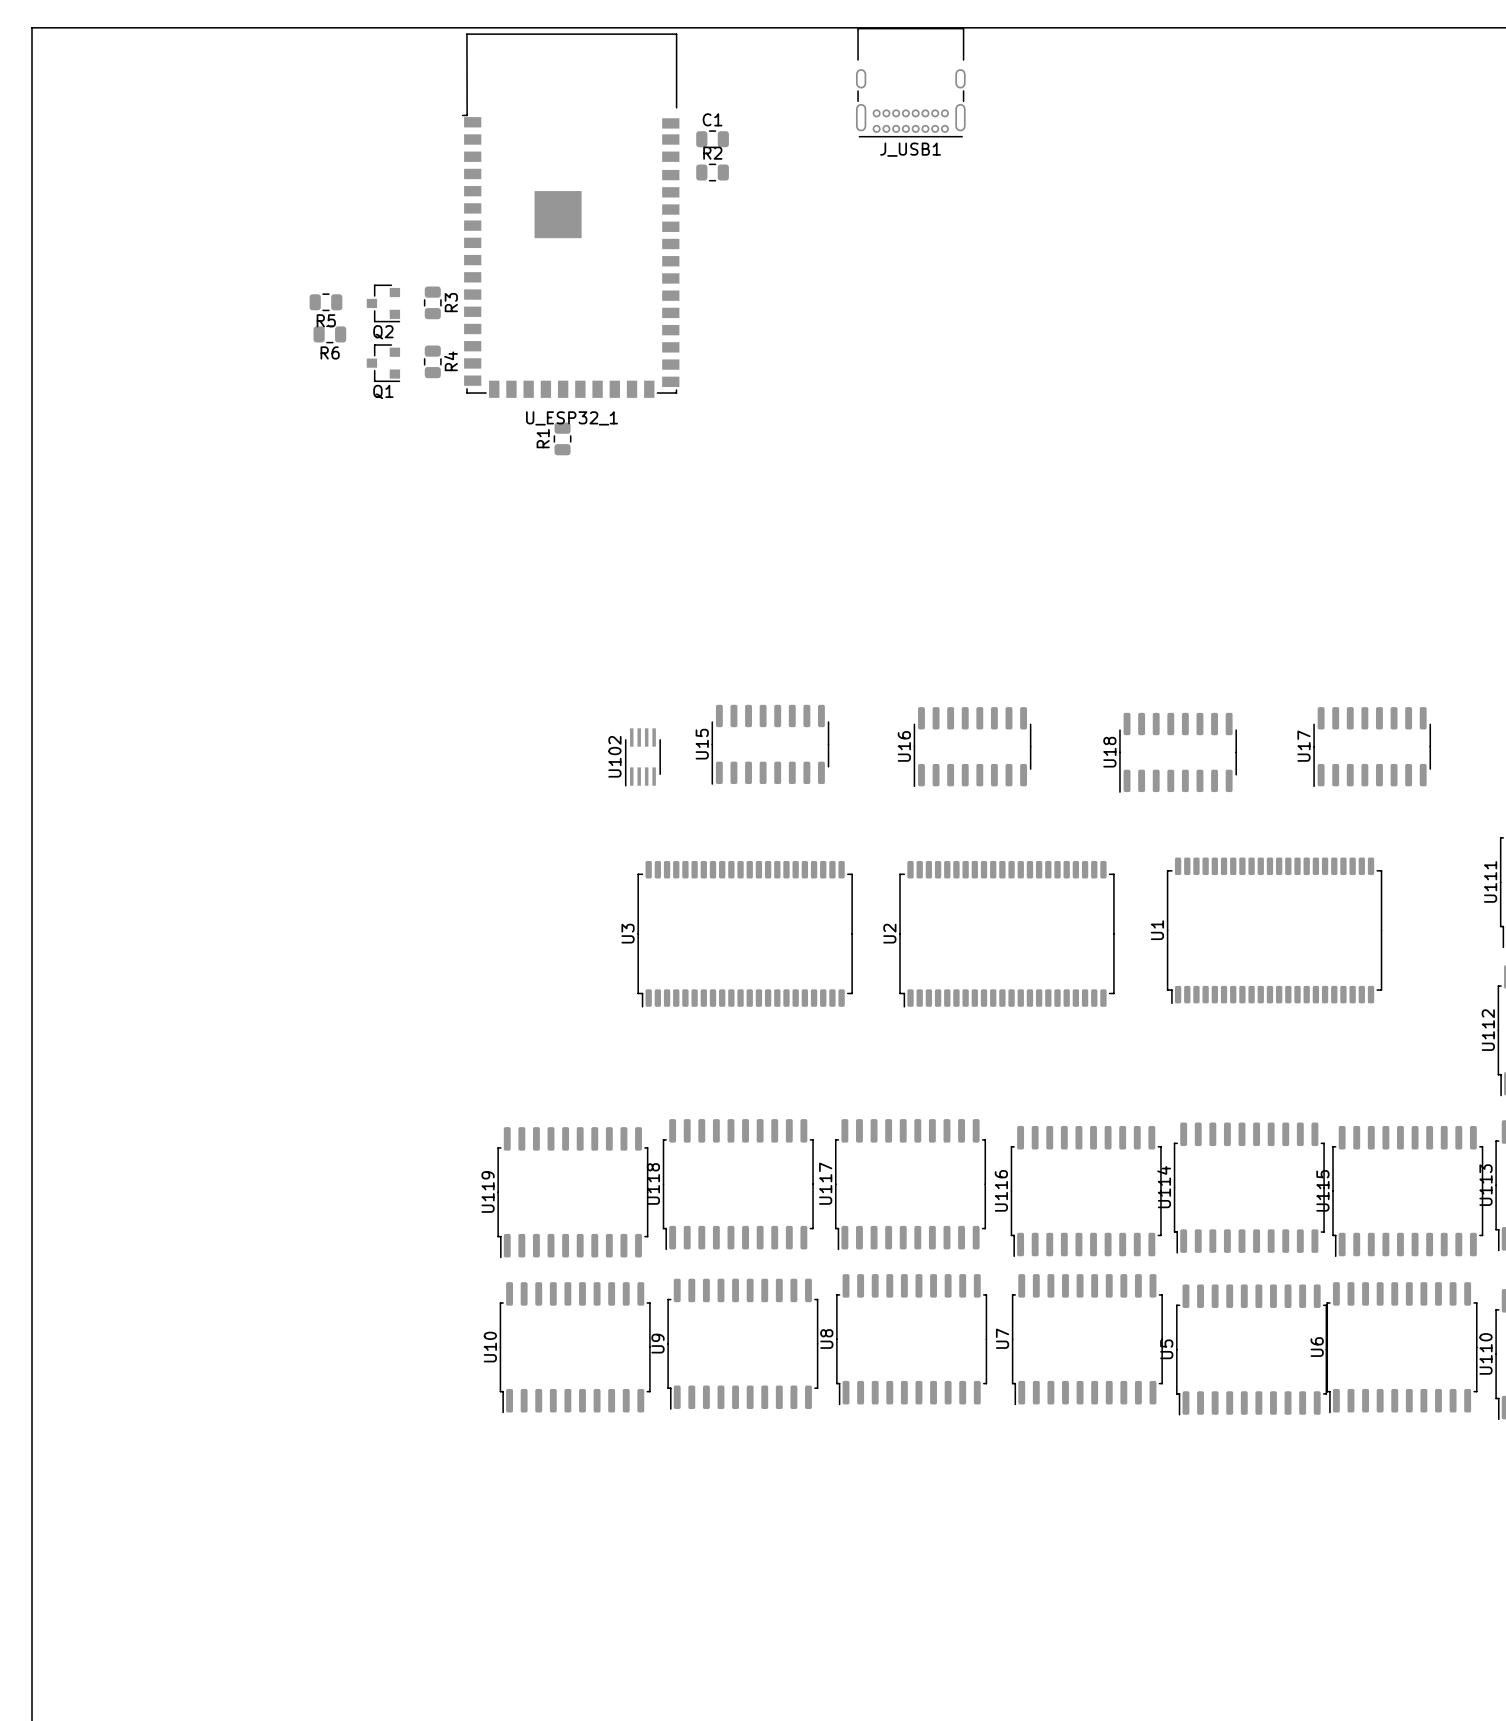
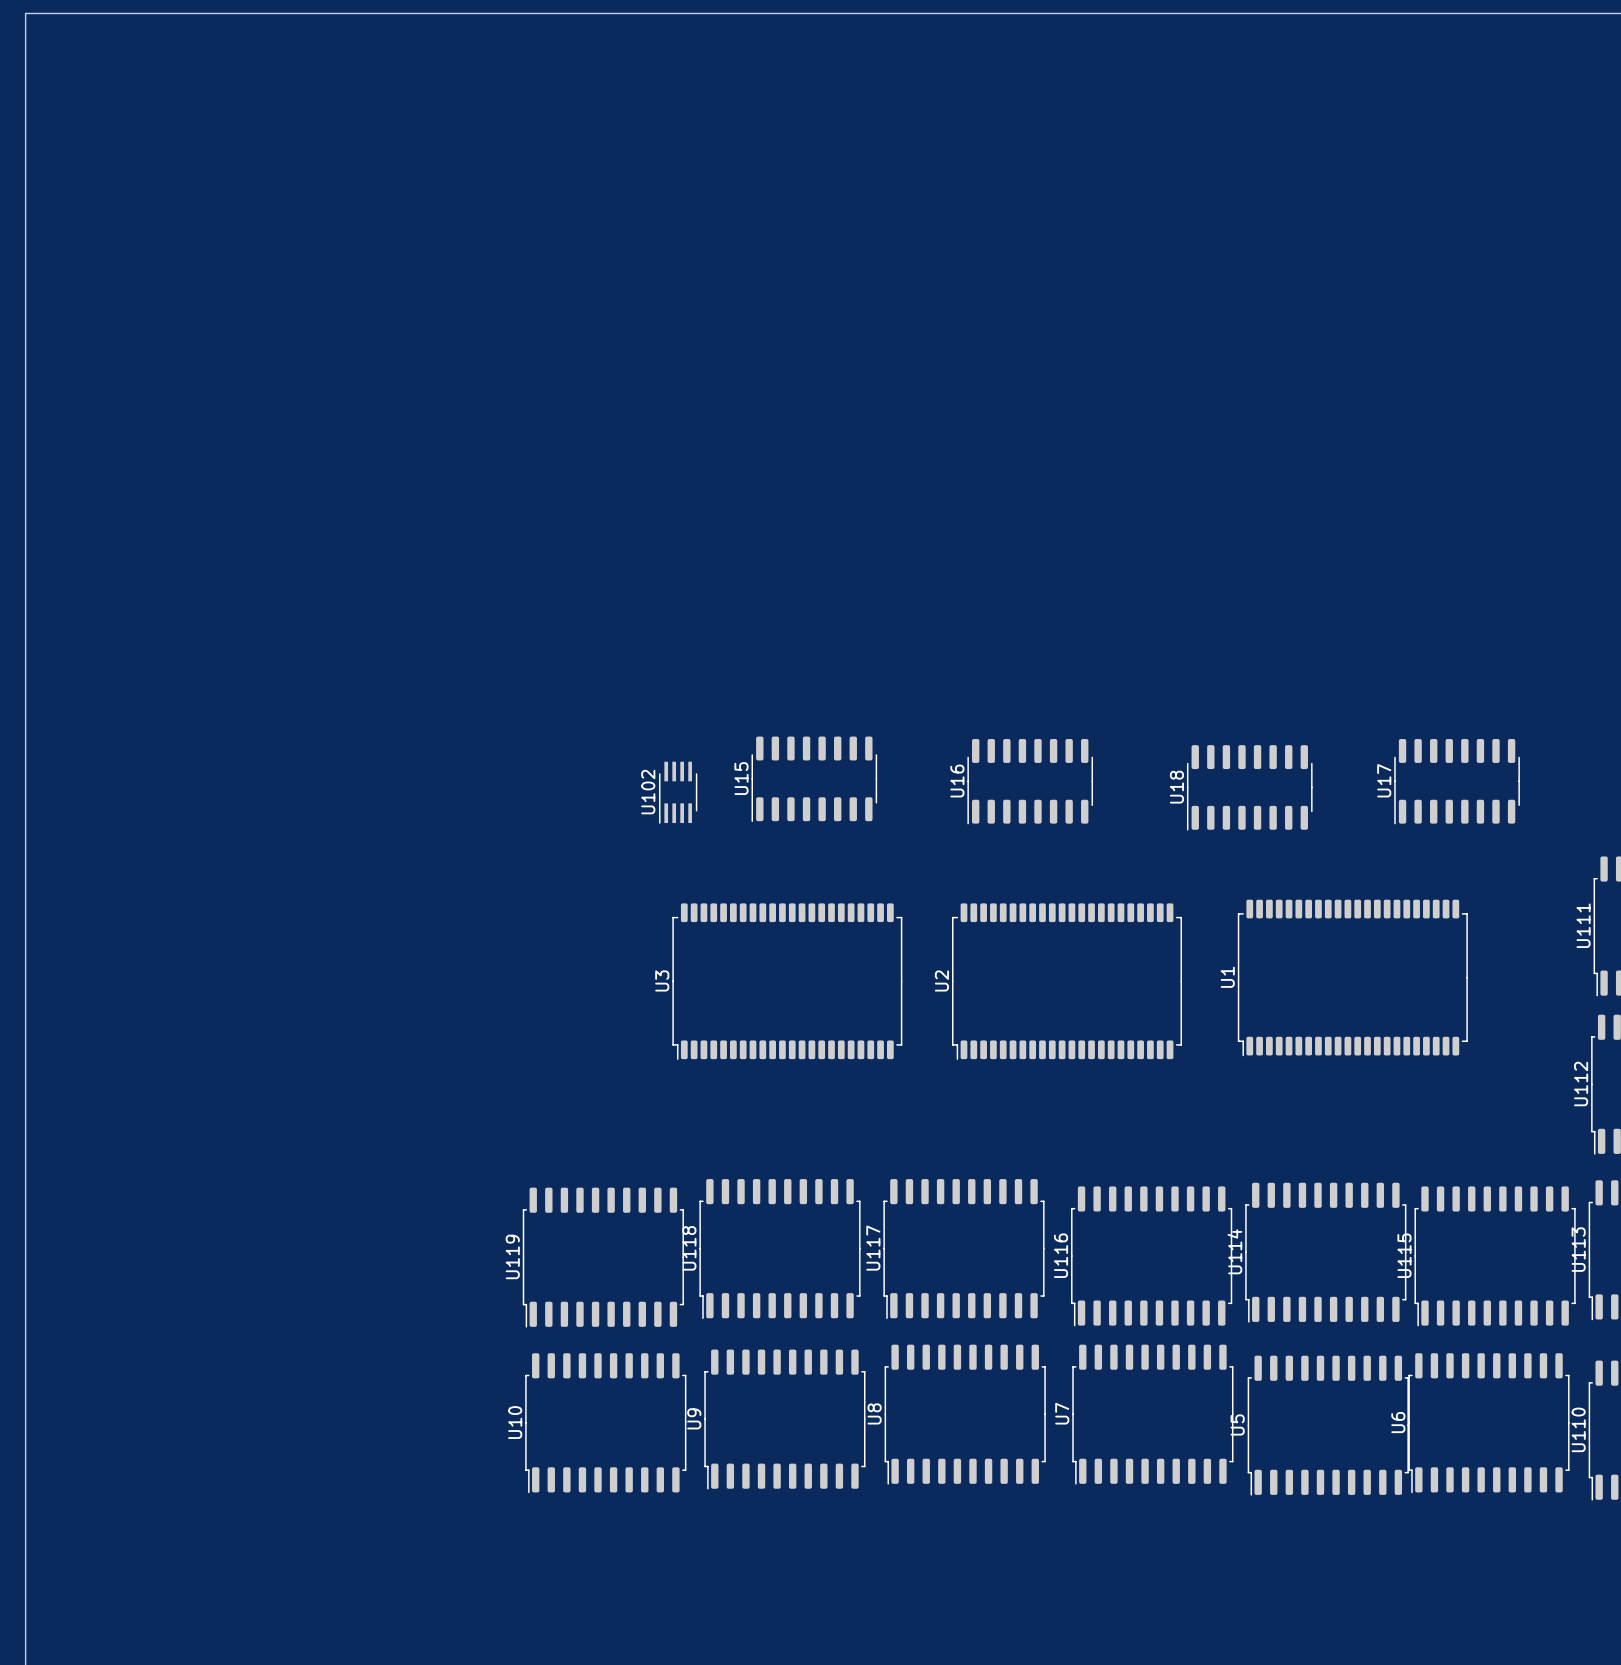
J_USB1: (910, 82) -> none
C1: (712, 139) -> none
R2: (712, 172) -> none
U_ESP32_1: (570, 215) -> none
R5: (325, 302) -> none
R3: (432, 302) -> none
Q2: (383, 303) -> none
R6: (329, 334) -> none
R4: (432, 361) -> none
Q1: (383, 363) -> none
R1: (562, 438) -> none

